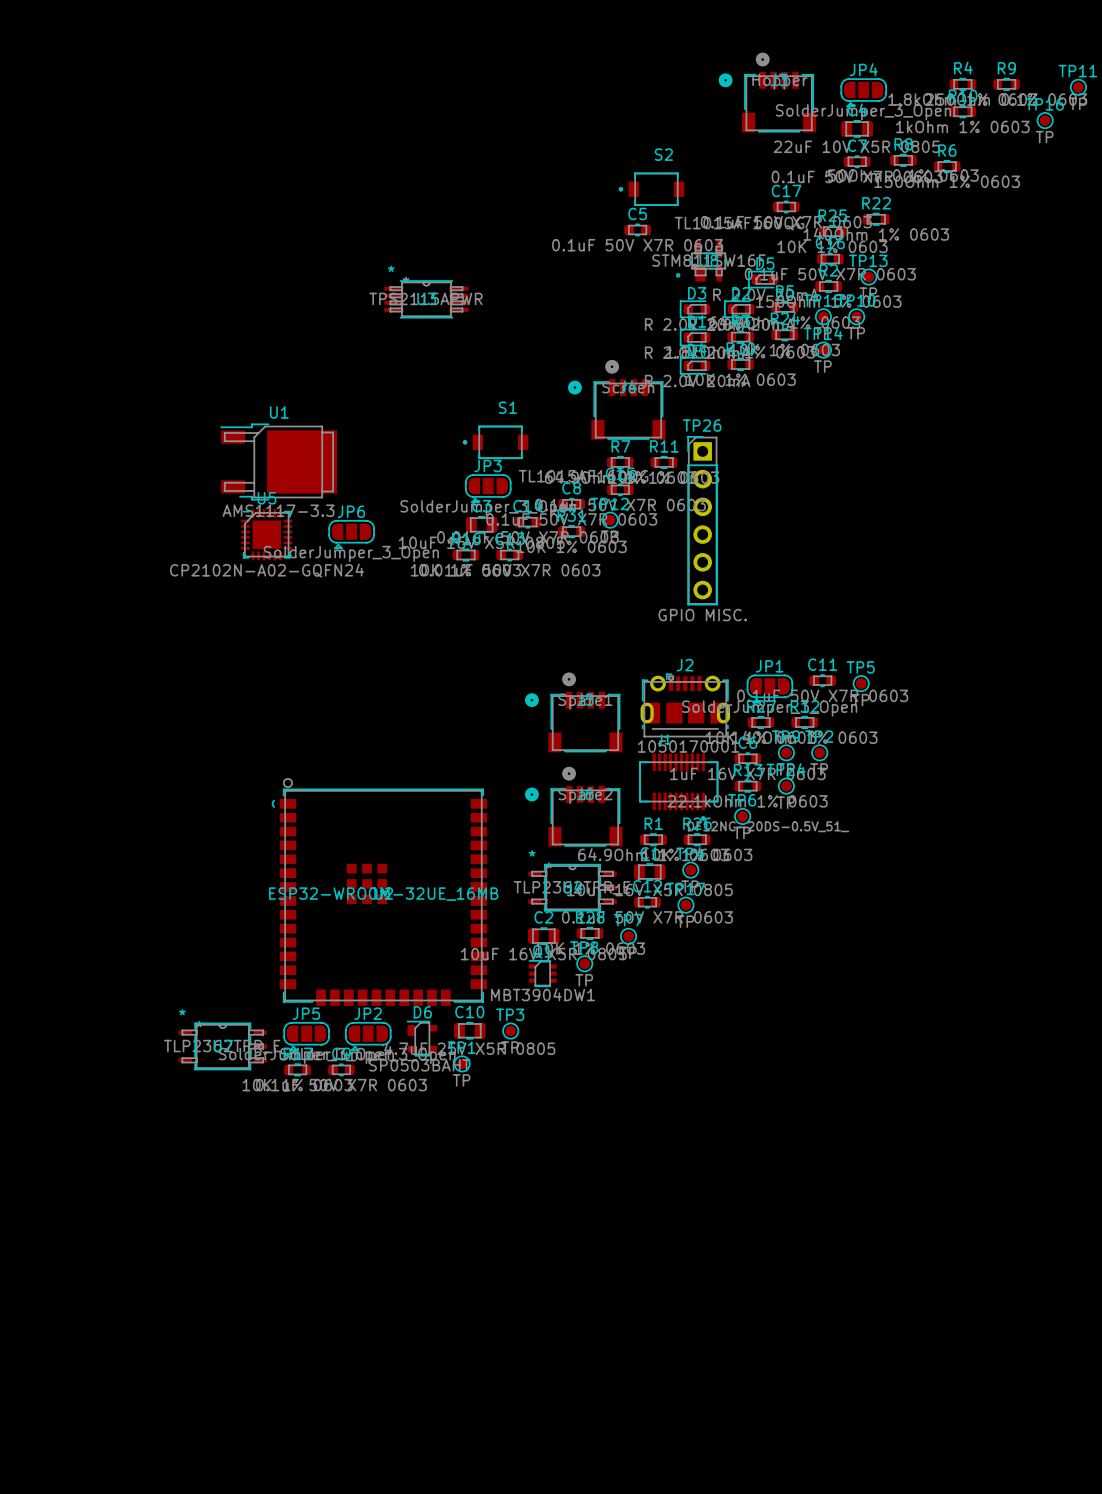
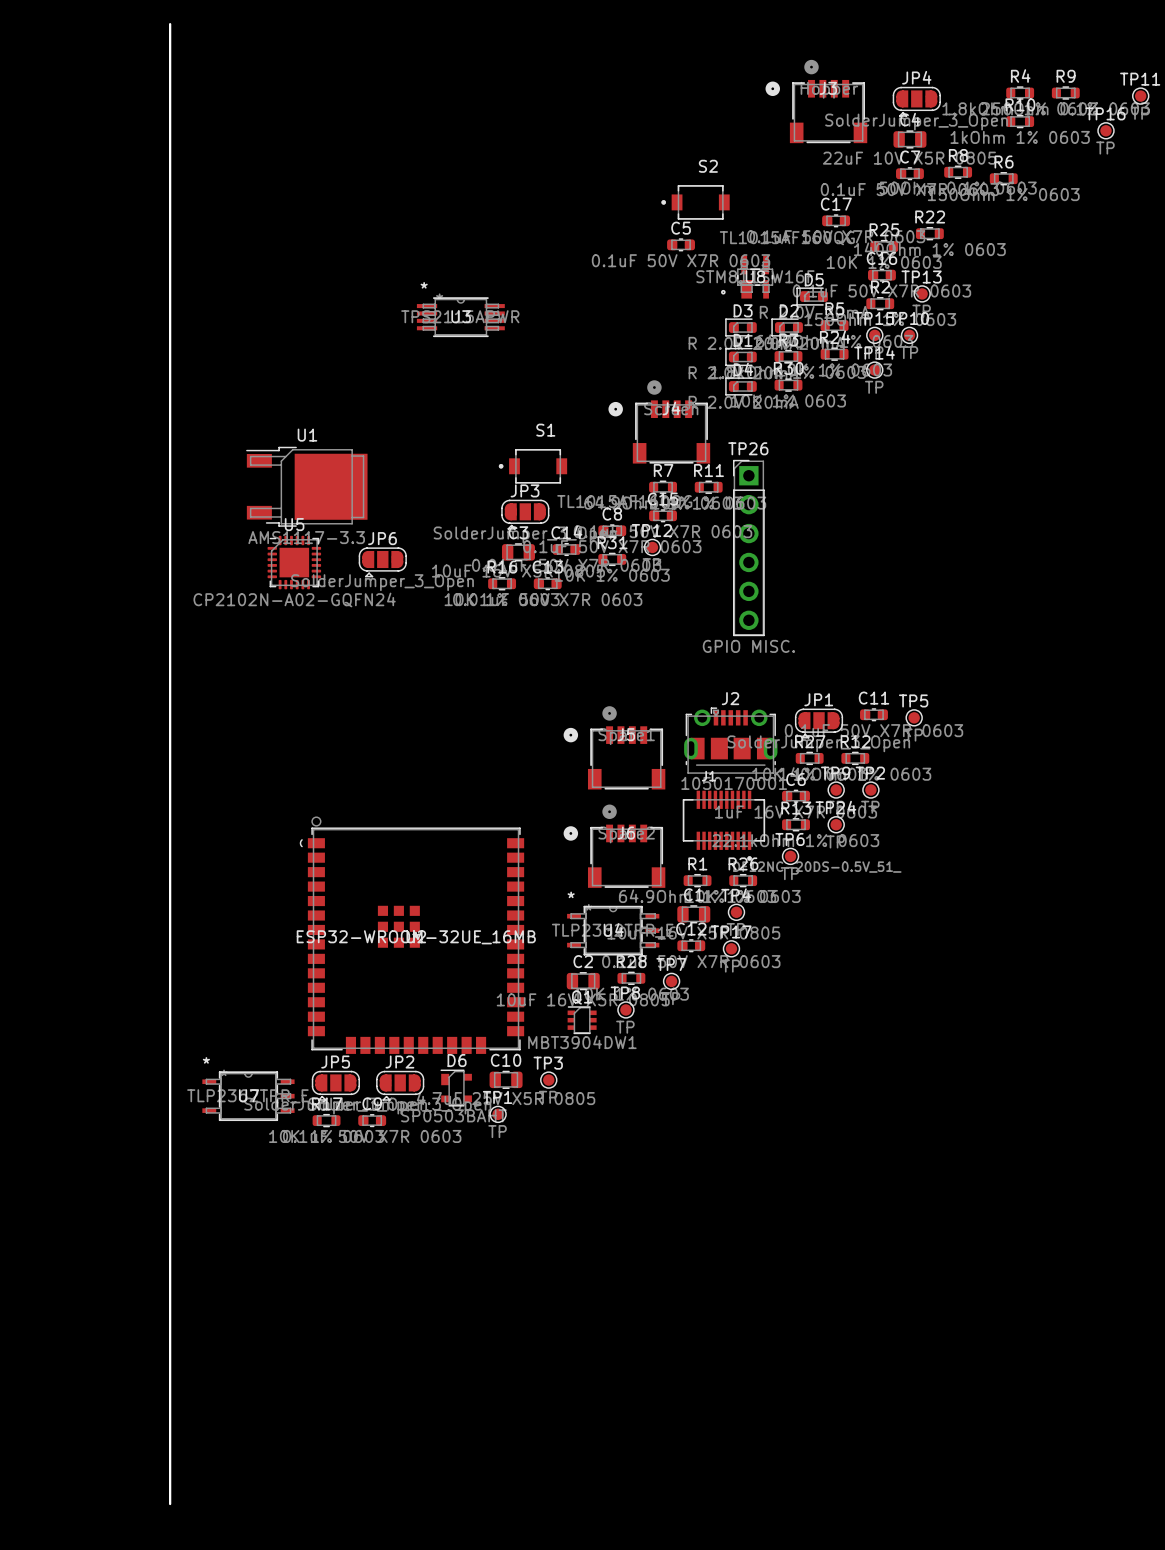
board edge: none -> (170, 24) (170, 1504)

